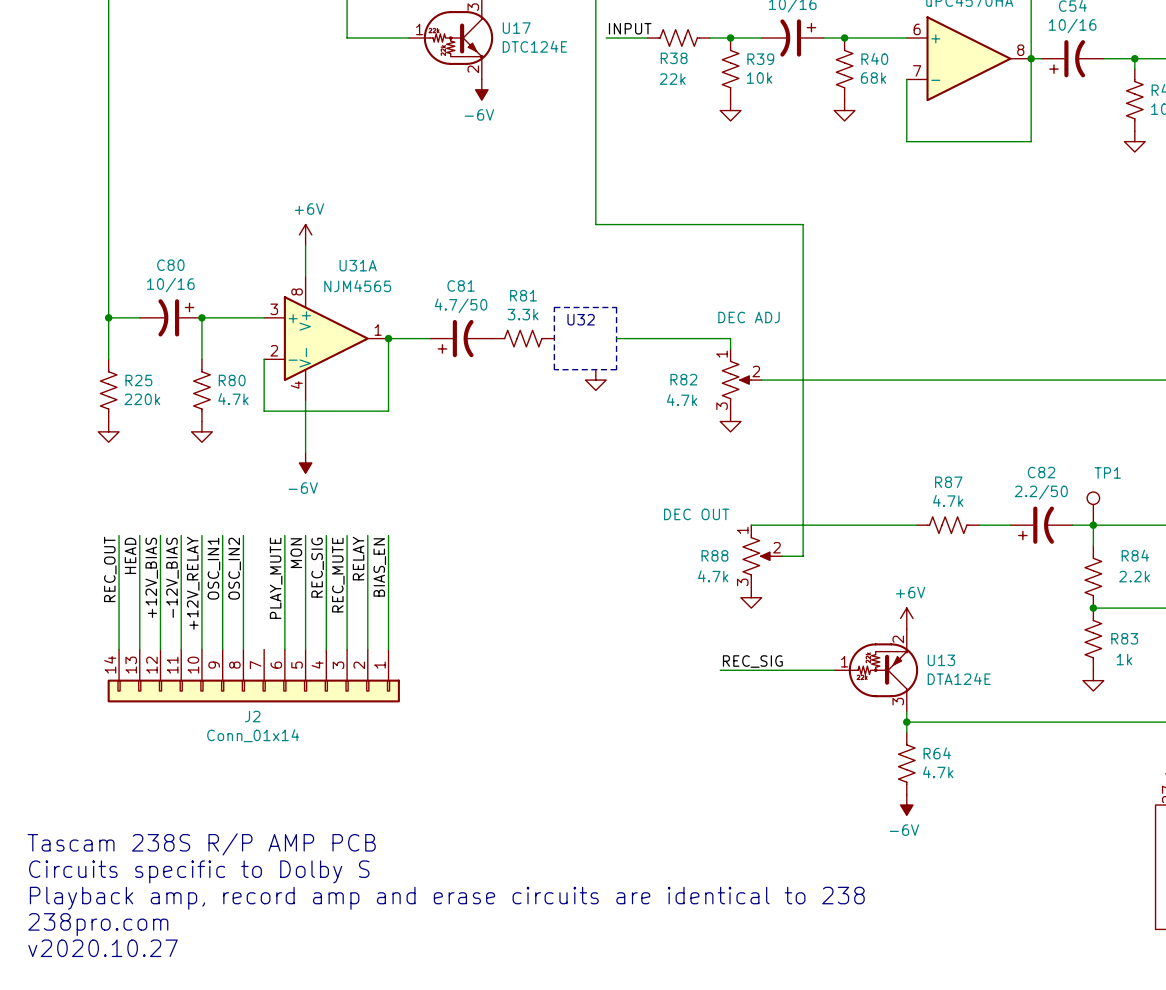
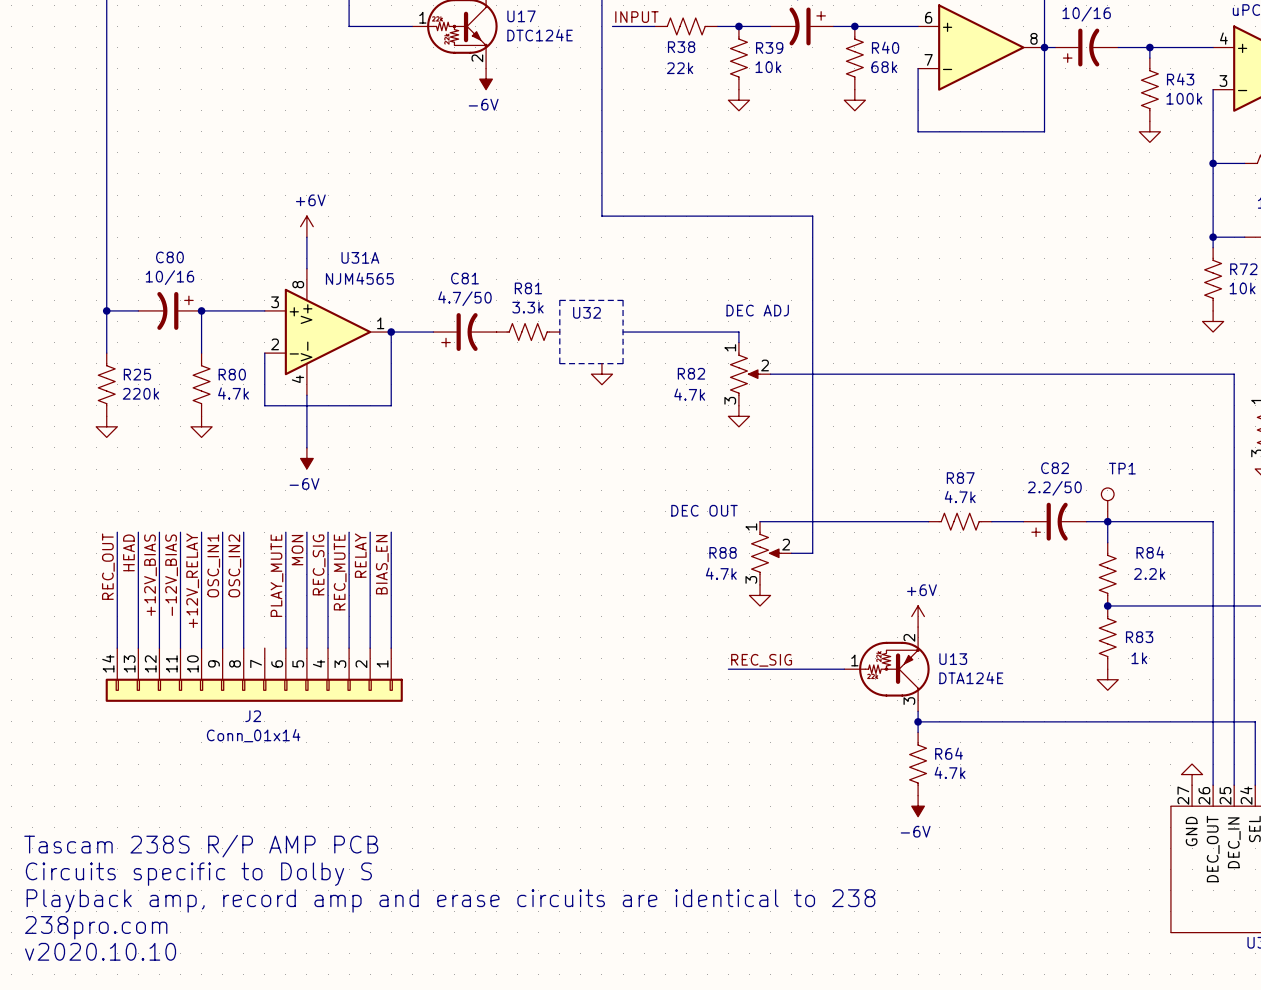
text: v2020.10.27 (102, 948) -> v2020.10.10 (100, 951)

